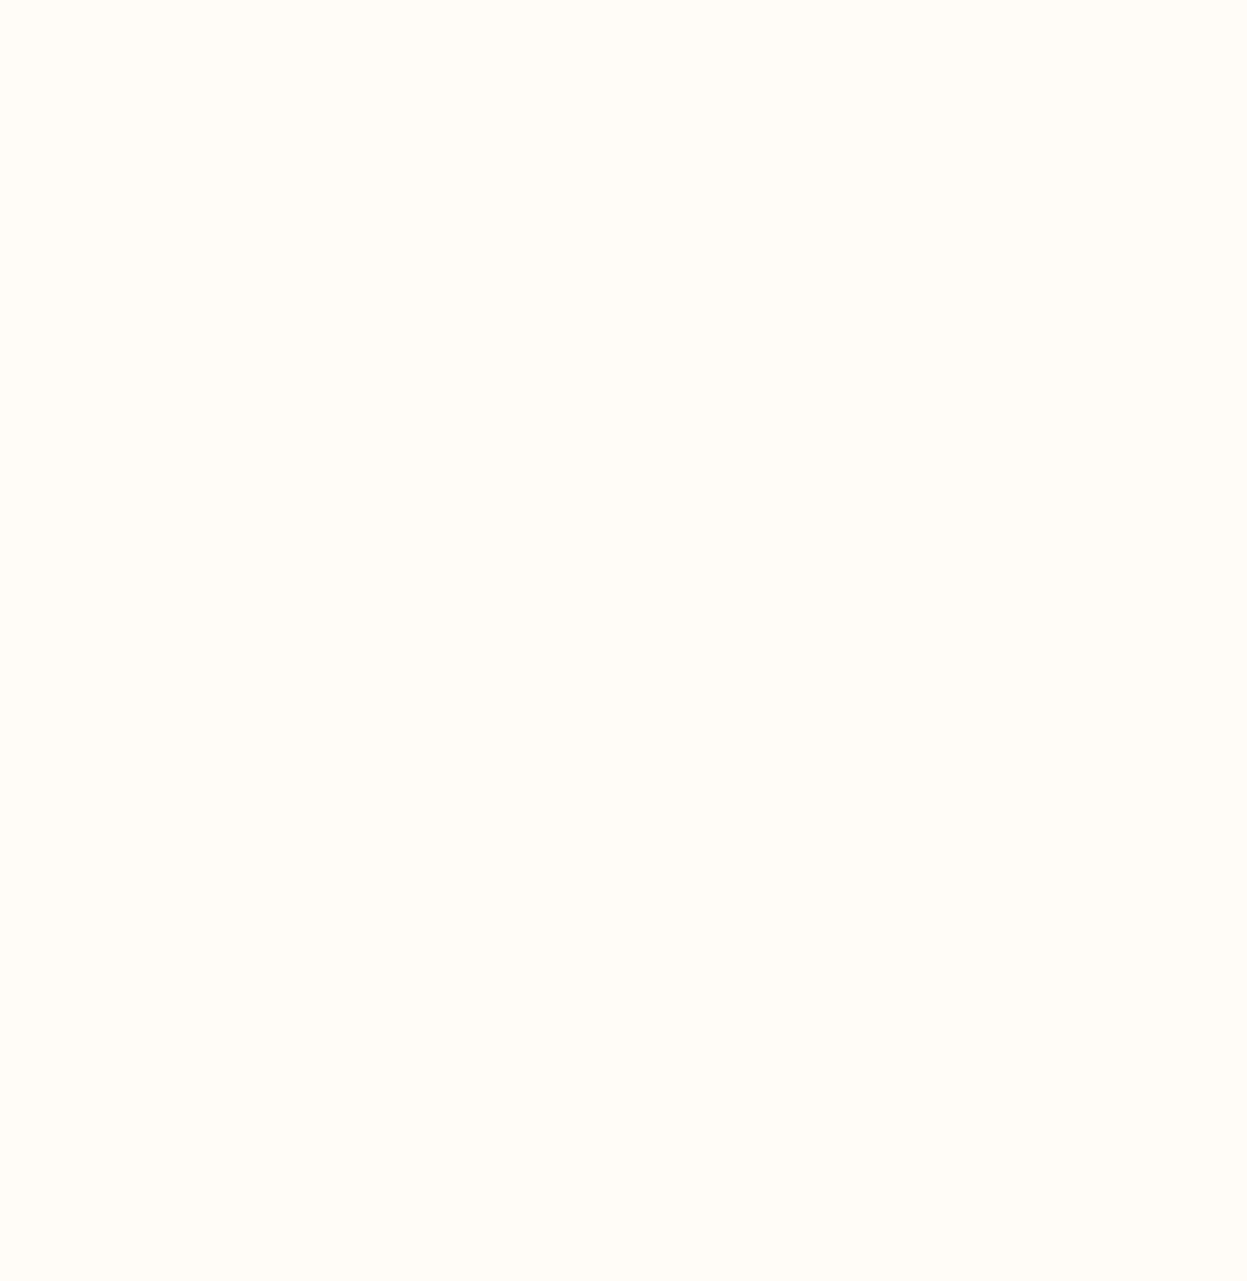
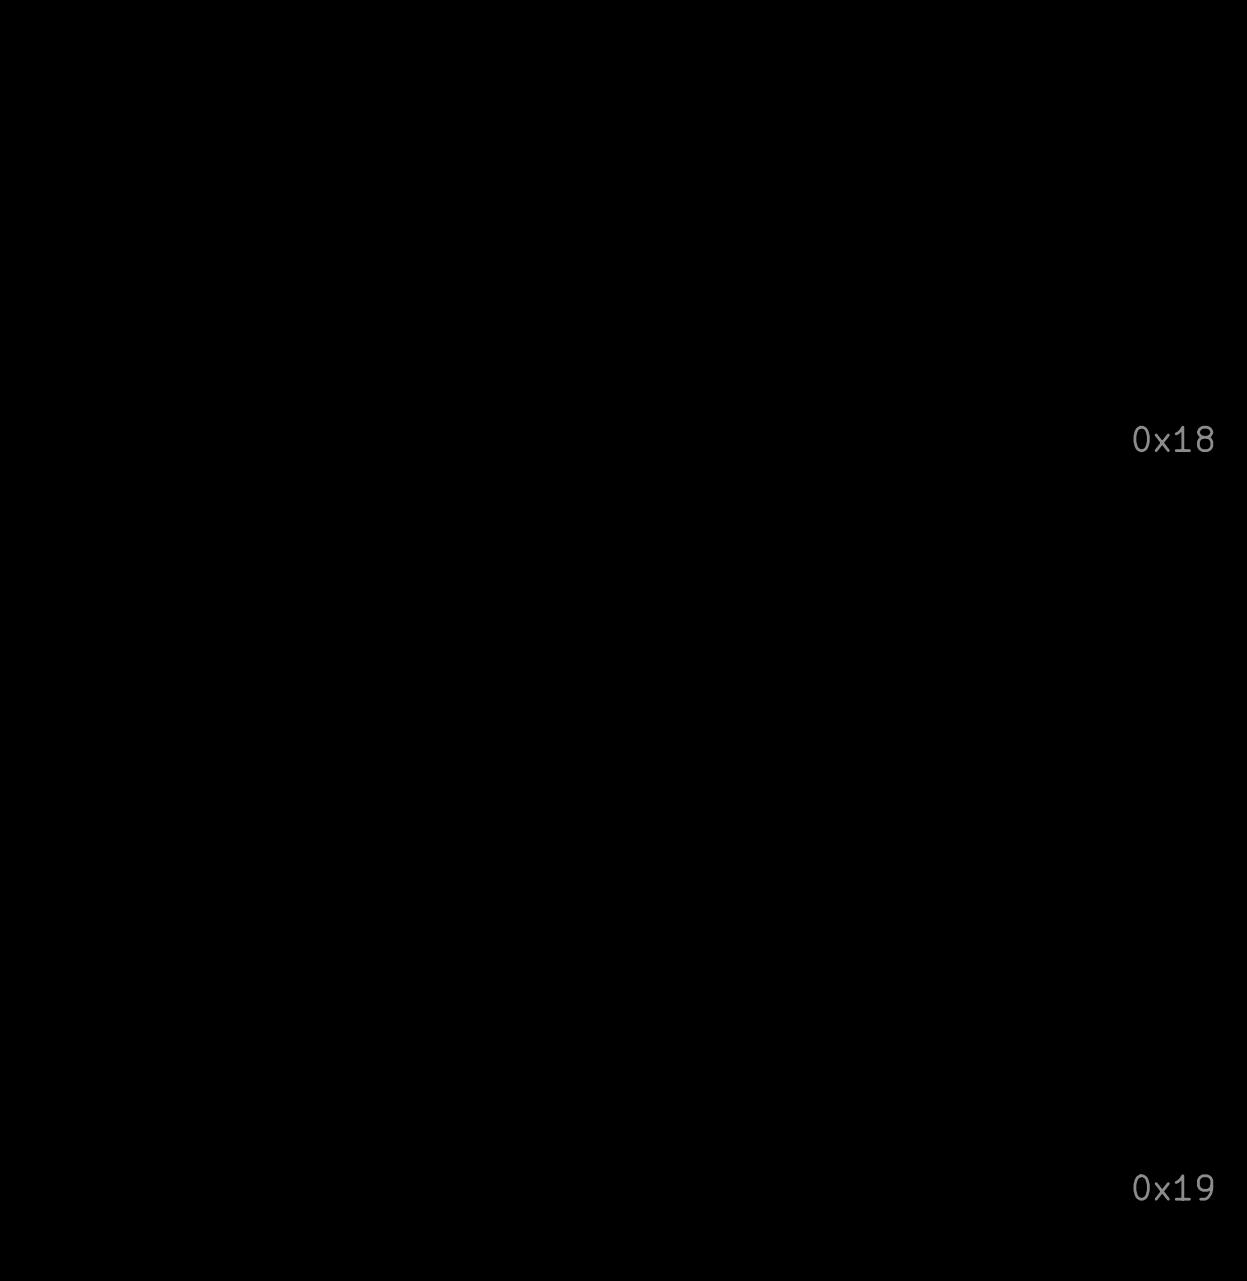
text: none -> 0x18 (1173, 438)
text: none -> 0x19 (1173, 1187)

